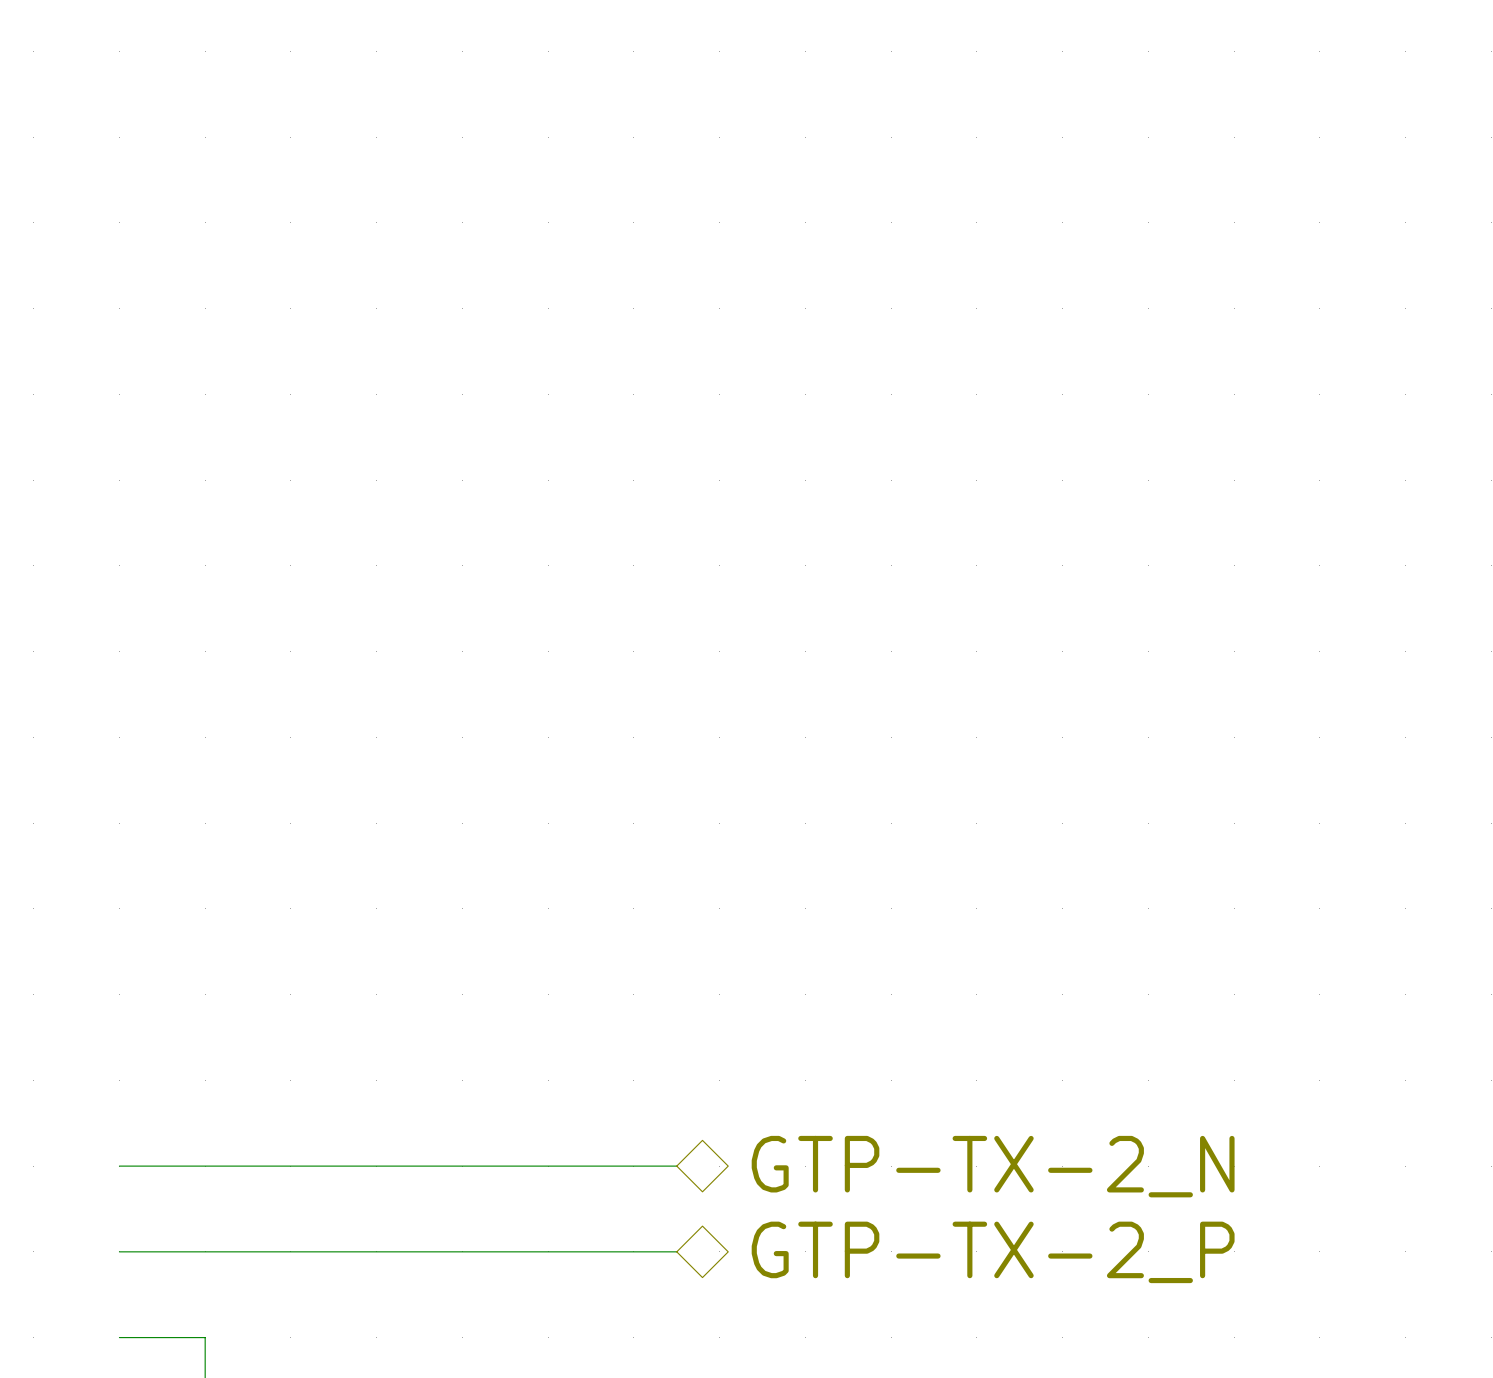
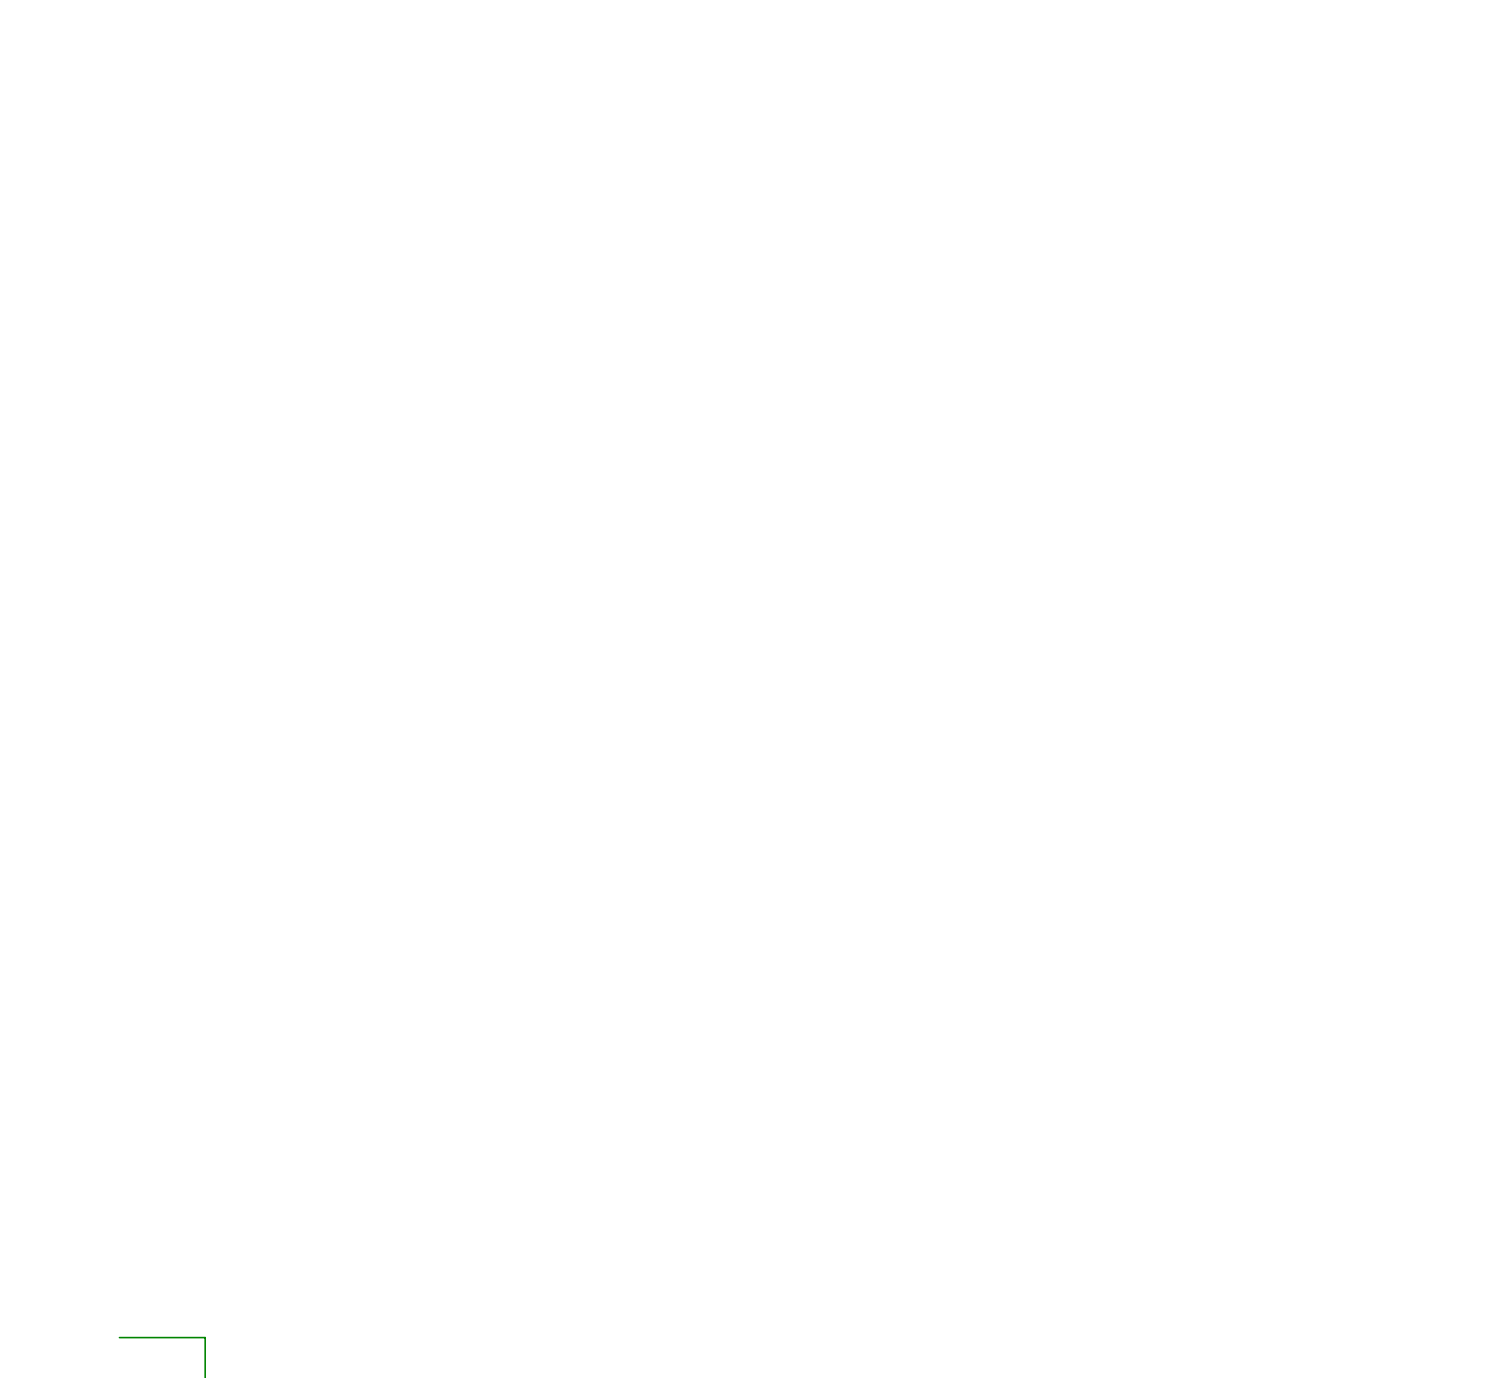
wire: (119, 1166) (676, 1166) -> none
hierarchical label: GTP-TX-2_N (993, 1166) -> none
wire: (119, 1251) (676, 1251) -> none
hierarchical label: GTP-TX-2_P (993, 1252) -> none

